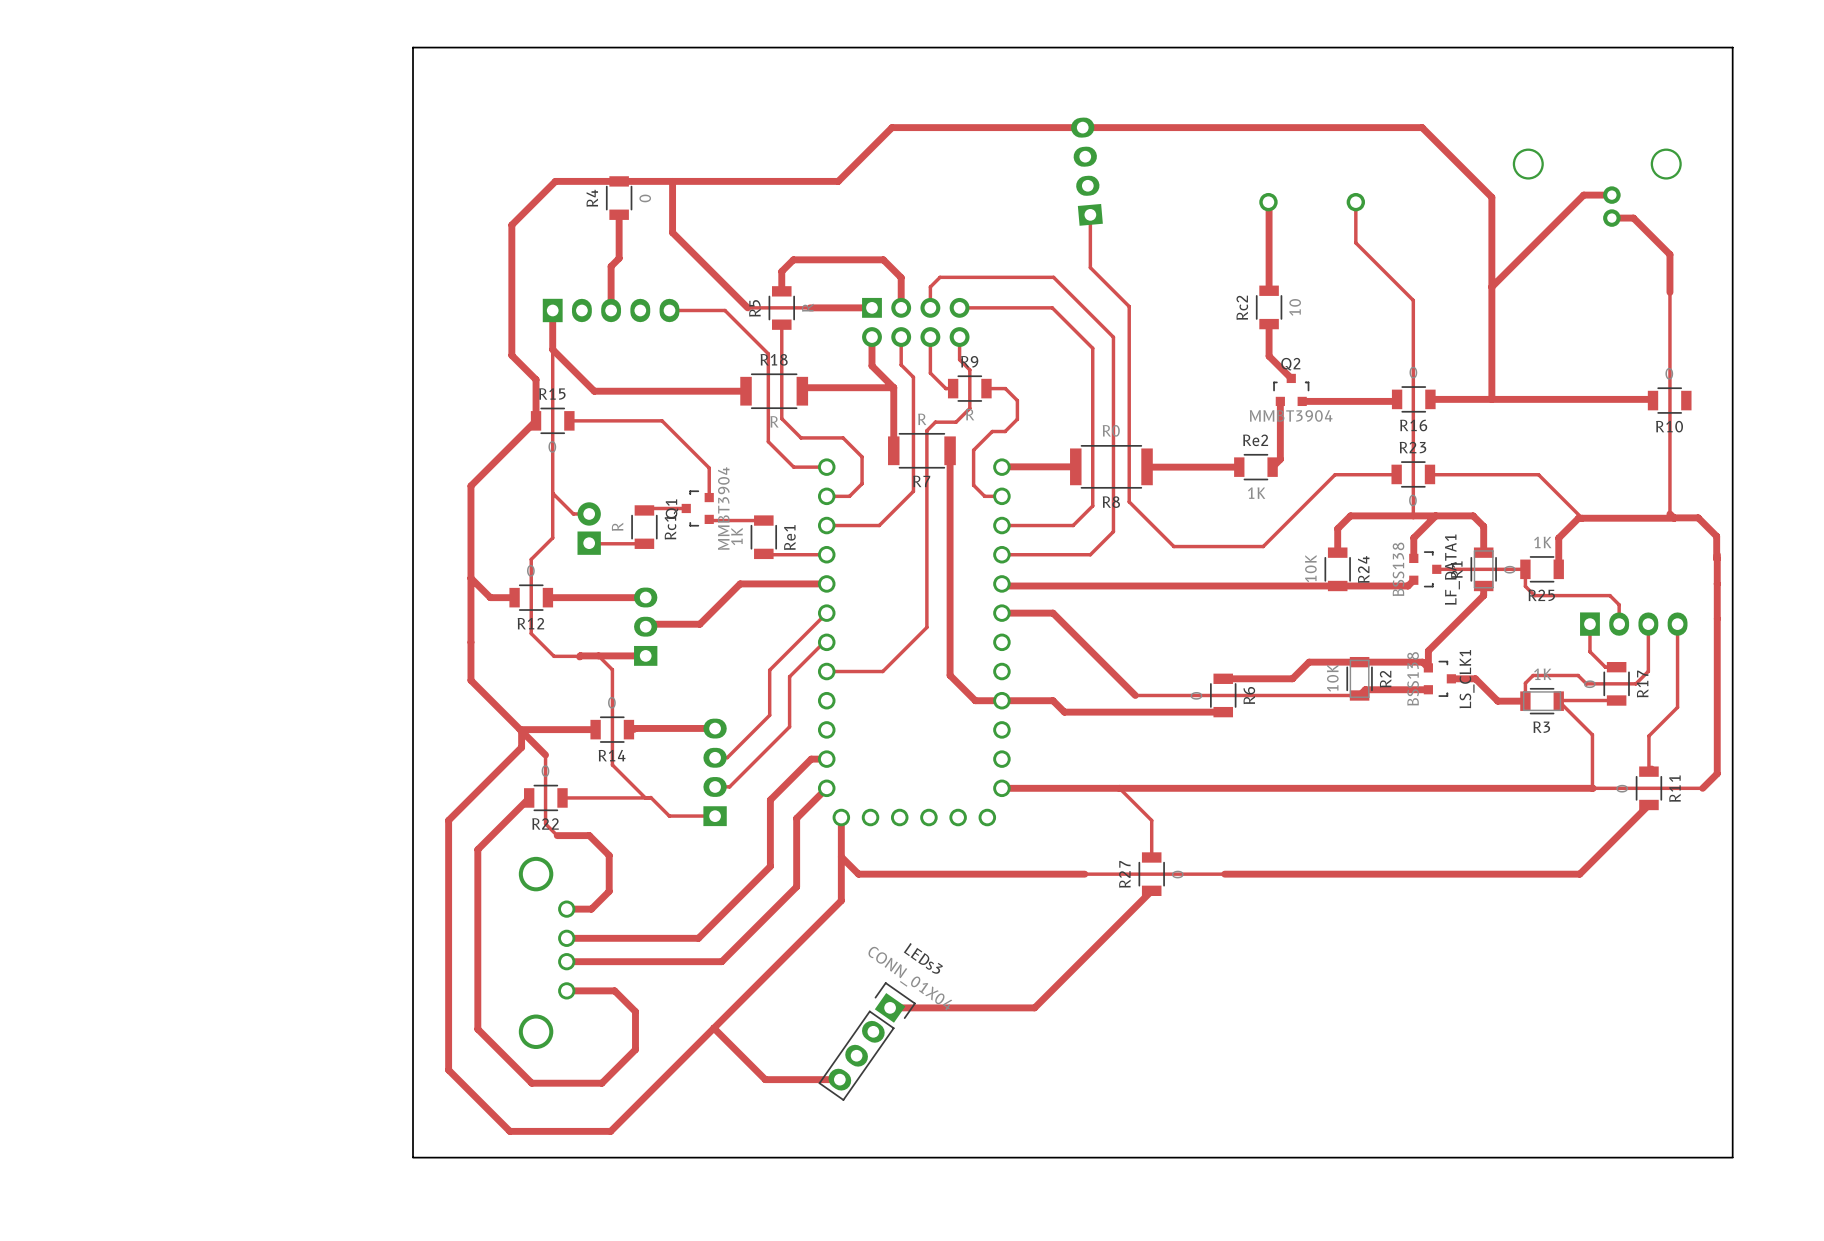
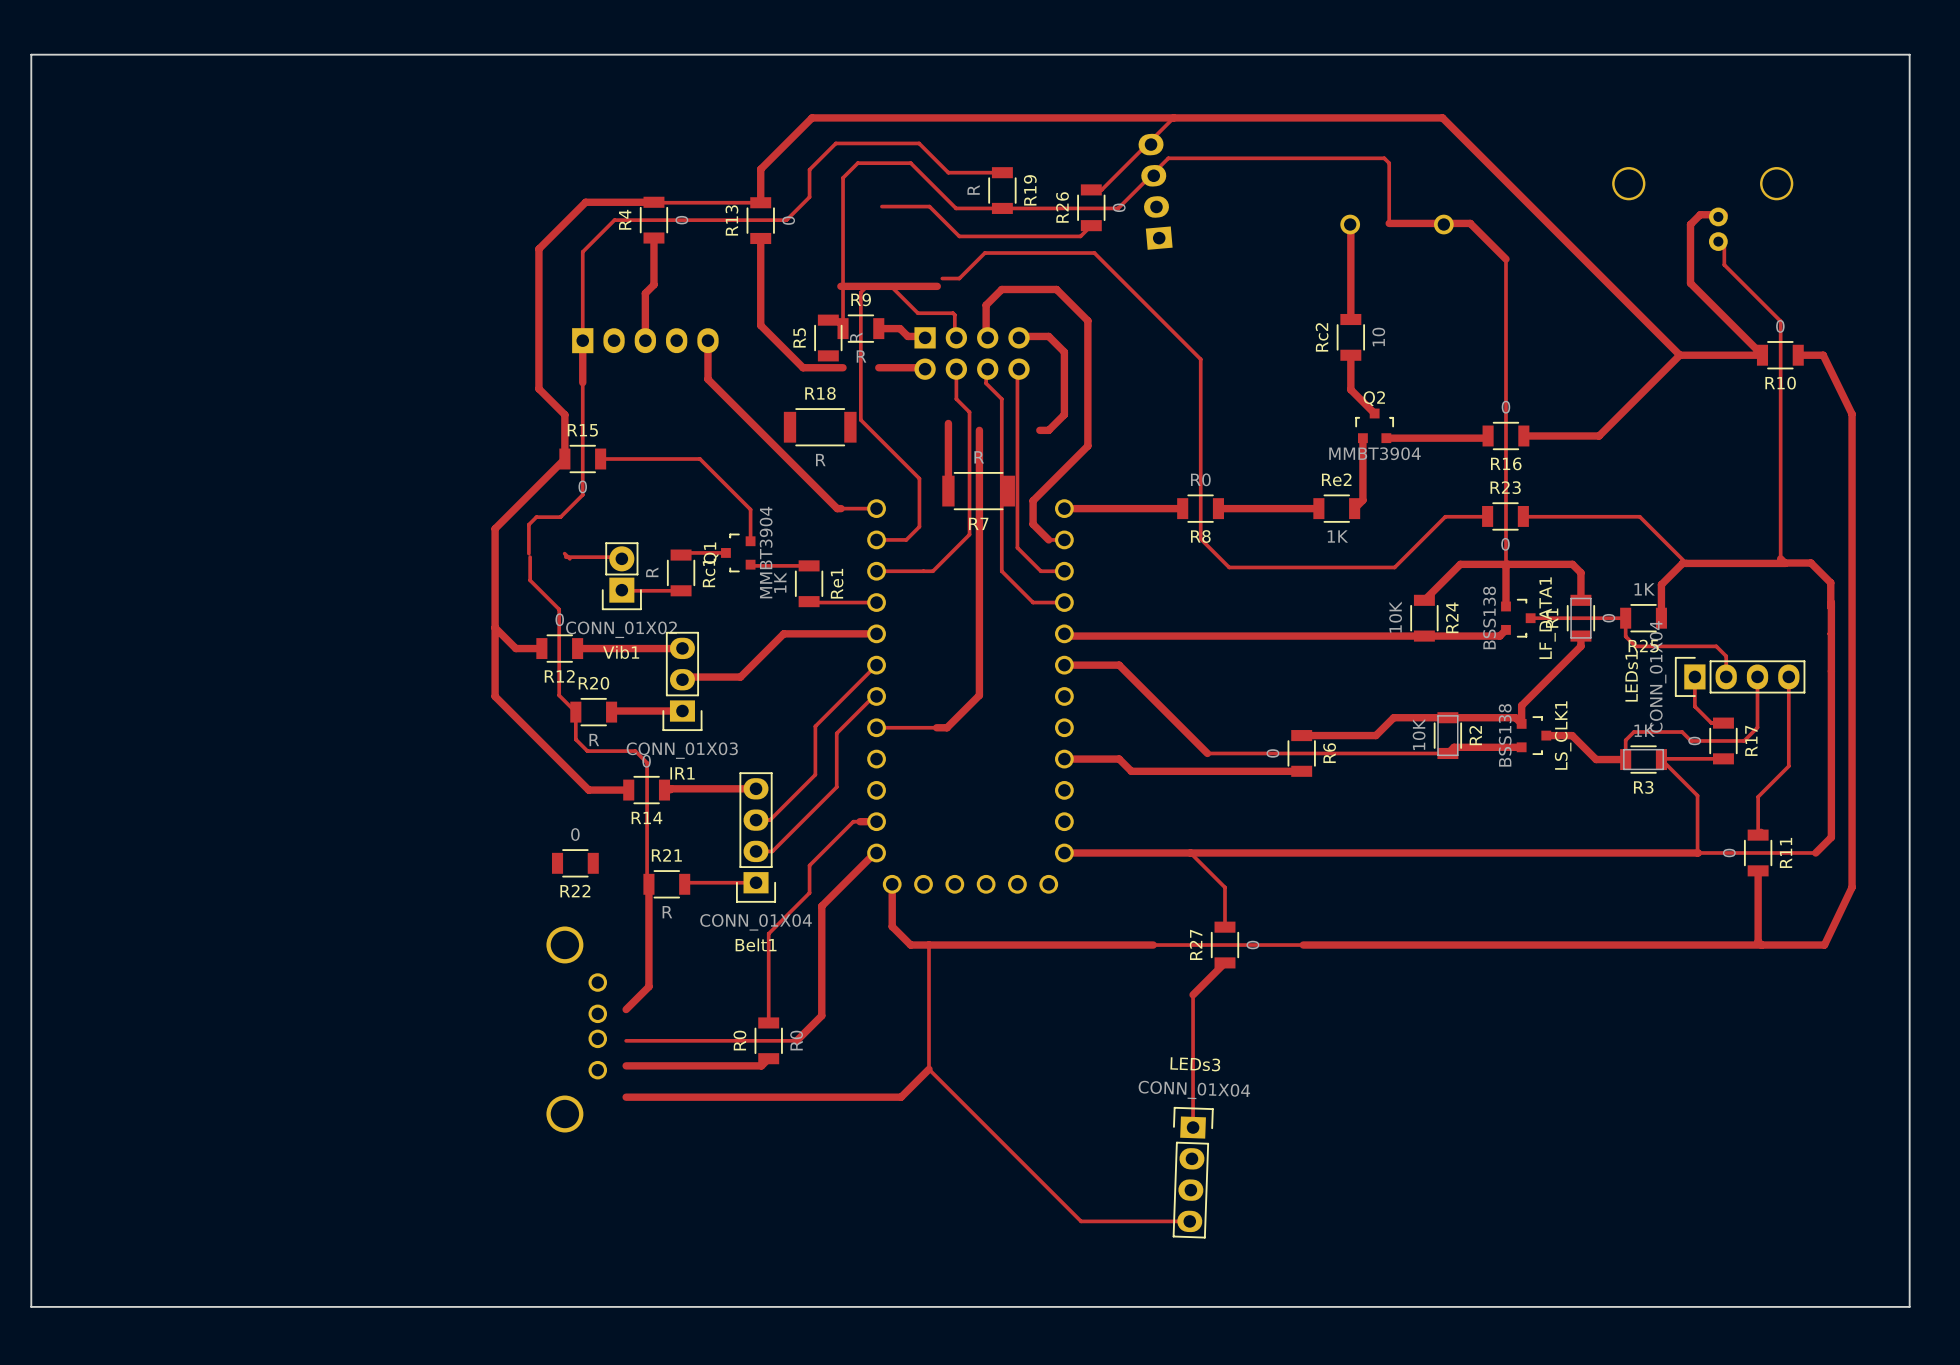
board edge: none -> (31, 54) (31, 1306) (1909, 1306) (1909, 54) (31, 54)
board edge: (1732, 47) (1732, 1157) -> none
board edge: (1732, 47) (413, 47) (413, 1157) -> none
track: none -> (1173, 117) (1101, 189) (1091, 189)
track: none -> (1002, 172) (948, 172) (919, 143) (835, 143) (809, 169) (809, 197) (786, 220) (614, 220) (582, 251) (582, 340)
R19: none -> R (1002, 190)
track: (619, 181) (838, 181) (892, 127) (1422, 127) (1491, 197) (1491, 399) -> none
track: none -> (654, 202) (760, 202) (760, 169) (812, 117) (1442, 117) (1679, 355)
track: (672, 181) (672, 232) (747, 307) (871, 307) -> none
track: none -> (881, 206) (929, 206) (959, 236) (1080, 236) (1091, 225)
R26: none -> 0 (1091, 207)
track: none -> (1724, 214) (1700, 214) (1690, 224) (1690, 283) (1762, 355) (1679, 355)
track: (1616, 195) (1583, 195) (1491, 286) -> none
R13: none -> 0 (760, 220)
track: (1355, 202) (1355, 242) (1413, 300) (1413, 515) -> none
track: (1090, 214) (1090, 267) (1129, 306) (1129, 501) (1173, 546) (1263, 546) (1335, 474) (1357, 474) -> (942, 278) (959, 278) (984, 253) (1094, 253) (1200, 359) (1200, 538) (1229, 567) (1394, 567) (1445, 516)
track: none -> (760, 238) (760, 325) (803, 367) (843, 367)
track: (1616, 218) (1633, 218) (1669, 254) (1669, 292) -> (1724, 239) (1724, 264) (1780, 321)
track: (793, 259) (781, 271) (781, 291) -> none
track: none -> (891, 286) (917, 313) (953, 313) (954, 315) (954, 336)
track: (883, 259) (901, 277) (901, 307) -> none
track: none -> (841, 327) (843, 328) (843, 177) (857, 163) (910, 163) (956, 208) (1118, 208) (1168, 158) (1384, 158) (1389, 163) (1389, 223) (1470, 223) (1505, 259) (1505, 566)
track: none -> (878, 328) (900, 328) (907, 336) (923, 336)
track: none -> (1017, 336) (1048, 336) (1064, 352) (1064, 414) (1048, 430) (1039, 430)
track: (930, 307) (930, 286) (940, 277) (1053, 277) (1113, 337) (1113, 531) (1090, 554) (1001, 554) -> (986, 367) (986, 383) (1001, 399) (1001, 571) (1033, 602) (1064, 602)
track: (959, 307) (1052, 307) (1092, 348) (1092, 505) (1073, 525) (1001, 525) -> (1017, 367) (1017, 547) (1040, 571) (1064, 571)
track: (669, 310) (724, 310) (768, 353) (768, 441) (793, 467) -> (707, 340) (707, 379) (837, 508) (841, 508)
track: (781, 324) (781, 418) (801, 437) (843, 437) (862, 456) (862, 483) (849, 496) -> (867, 286) (860, 292) (860, 420) (919, 478) (919, 526) (906, 539) (900, 539)
track: none -> (1797, 355) (1823, 355) (1852, 414) (1852, 887) (1824, 945) (1683, 945)
track: none -> (878, 367) (923, 367)
track: (871, 337) (871, 365) (893, 387) (805, 387) (802, 391) -> none
track: (930, 337) (930, 373) (945, 388) (953, 388) -> none
track: (959, 337) (959, 359) (969, 369) (969, 408) (956, 422) (935, 422) (926, 430) (926, 627) (882, 671) -> (979, 430) (979, 695) (946, 727) (936, 727)
track: (552, 349) (594, 391) (746, 391) -> none
R9 position: (969, 388) -> (860, 328)
track: (986, 388) (1005, 388) (1017, 400) (1017, 419) (1005, 431) (992, 431) (973, 450) (973, 485) (984, 496) (987, 496) -> (986, 336) (986, 305) (1001, 289) (1056, 289) (1087, 320) (1087, 446) (1033, 500) (1033, 524) (1048, 539)
track: (1500, 399) (1653, 400) -> (1599, 435) (1679, 355)
R10 position: (1669, 400) -> (1780, 355)
R8 footprint: [1070, 445, 1153, 489] -> [1177, 494, 1224, 523]
track: (950, 450) (950, 675) (975, 700) (1001, 700) -> none
track: (552, 454) (552, 537) (531, 559) (531, 633) (554, 656) (580, 655) -> (582, 494) (560, 517) (536, 517) (528, 524) (528, 553)
track: (1075, 466) (1001, 467) -> (1182, 508) (1064, 508)
track: (552, 493) (573, 513) (589, 513) -> none
track: none -> (564, 553) (569, 558)
track: none -> (530, 557) (530, 580) (559, 609) (559, 695) (575, 712) (575, 739) (587, 751) (635, 751) (647, 762) (648, 986) (626, 1009)
track: none -> (565, 557) (620, 557)
track: (1435, 515) (1413, 537) -> (1507, 564) (1505, 566) (1505, 584)
track: (1483, 526) (1473, 515) (1350, 515) (1337, 528) (1337, 552) -> (1580, 572) (1572, 564) (1460, 564) (1424, 600)
Vib1 side: bottom (589, 528) -> top (621, 576)
LEDs1 side: bottom (1633, 624) -> top (1740, 676)
IR1 side: bottom (645, 626) -> top (682, 681)
track: (470, 642) (470, 680) (545, 755) (545, 823) (557, 836) -> none
track: (598, 655) (612, 669) (612, 764) (645, 797) -> none
R20: none -> R (593, 712)
track: (520, 729) (558, 729) -> (495, 696) (588, 790)
track: (521, 731) (521, 747) (448, 820) (448, 1070) (509, 1131) (610, 1131) (841, 900) (841, 857) -> none
track: (811, 759) (770, 799) (770, 866) (698, 938) (566, 938) -> (859, 821) (853, 821) (809, 865) (809, 892) (768, 933) (768, 1022)
Belt1 side: bottom (715, 772) -> top (756, 837)
track: none -> (874, 852) (821, 906) (821, 1015) (796, 1040) (626, 1040)
track: (826, 788) (796, 818) (796, 886) (721, 961) (566, 961) -> none
track: (529, 797) (477, 849) (477, 1029) (531, 1083) (601, 1083) (635, 1049) (635, 1011) (614, 990) (566, 990) -> none
track: (562, 797) (650, 797) (669, 816) -> (684, 884) (707, 882)
track: (1648, 804) (1579, 874) -> (1758, 870) (1758, 941) (1761, 945)
R21: none -> R (666, 884)
track: (557, 835) (589, 835) (609, 855) (609, 891) (591, 909) (566, 909) -> none
track: none -> (928, 945) (928, 1069)
track: (1121, 920) (1034, 1007) (890, 1007) -> (1193, 994) (1193, 1127)
R0: none -> R0 (768, 1040)
track: none -> (768, 1058) (761, 1065) (626, 1065)
track: none -> (928, 1069) (1081, 1221) (1189, 1221)
track: none -> (928, 1069) (901, 1097) (626, 1097)
track: (713, 1028) (765, 1079) (839, 1079) -> none
LEDs3 rotation: 0° (867, 1041) -> 33° counterclockwise (1193, 1172)
LEDs3 position: (867, 1041) -> (1193, 1172)
board edge: (413, 1157) (1732, 1157) -> none

